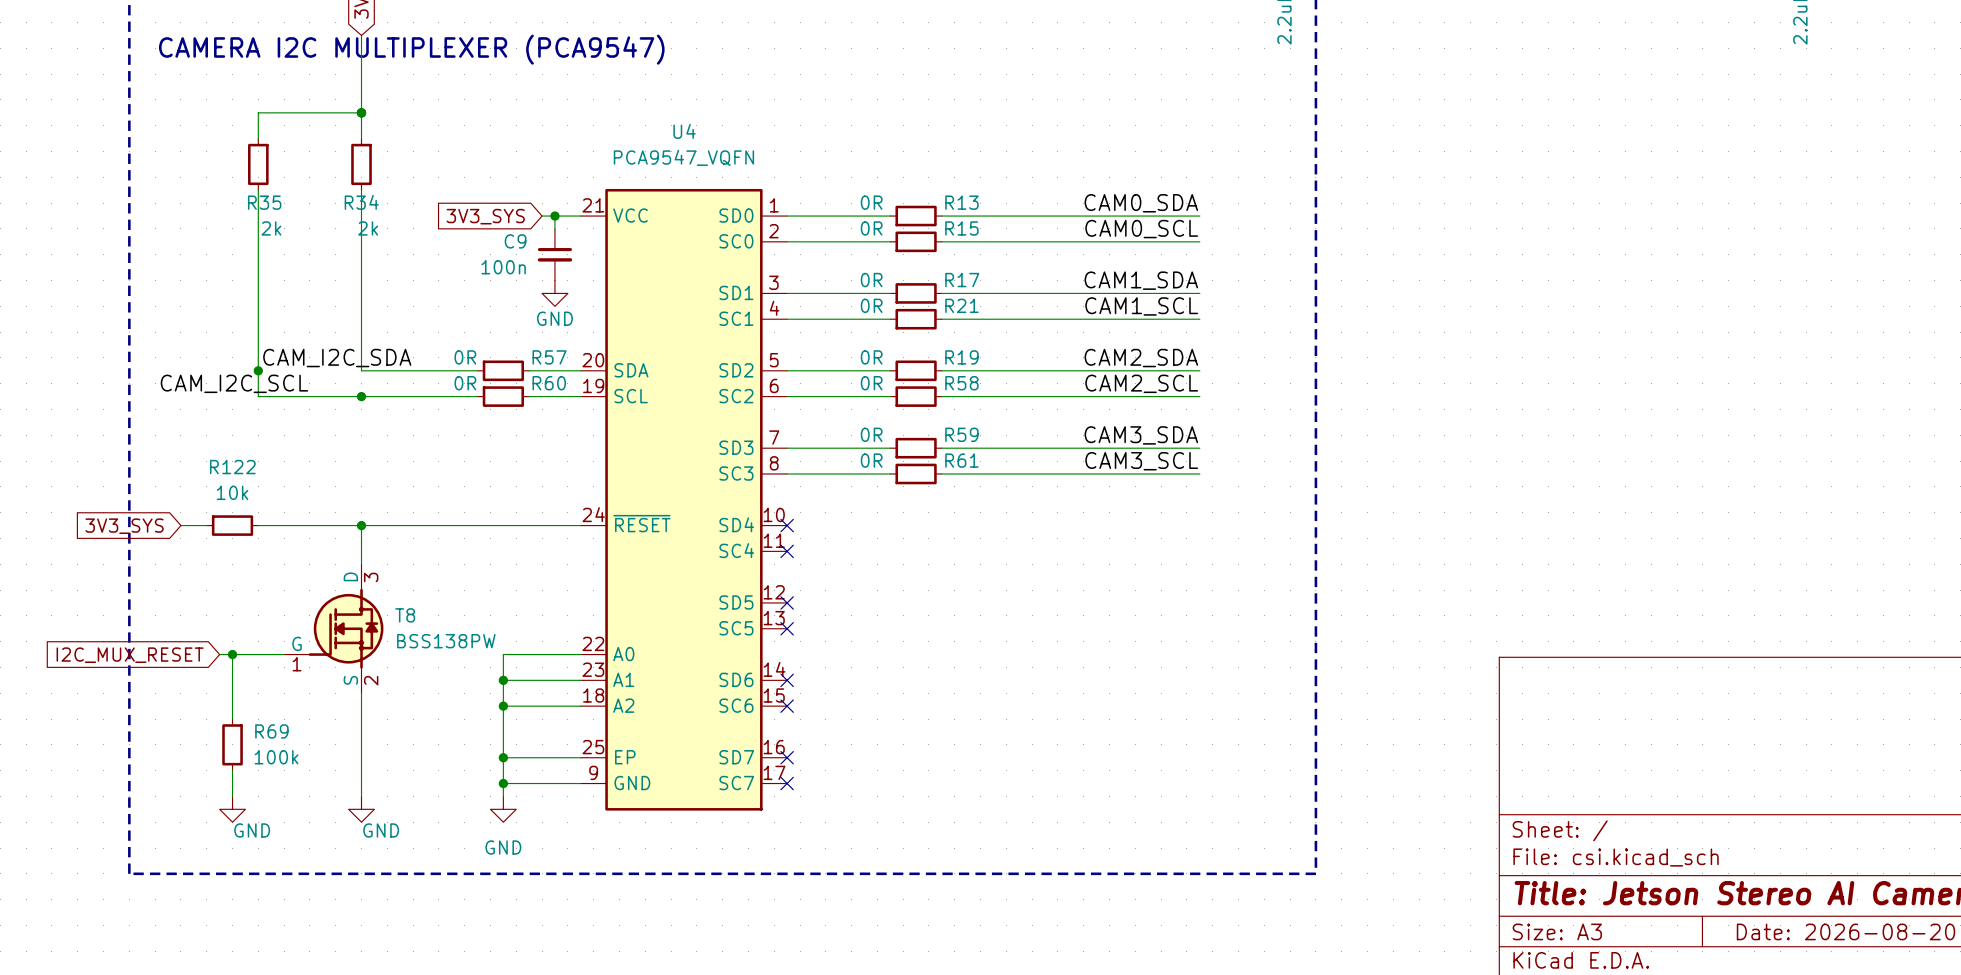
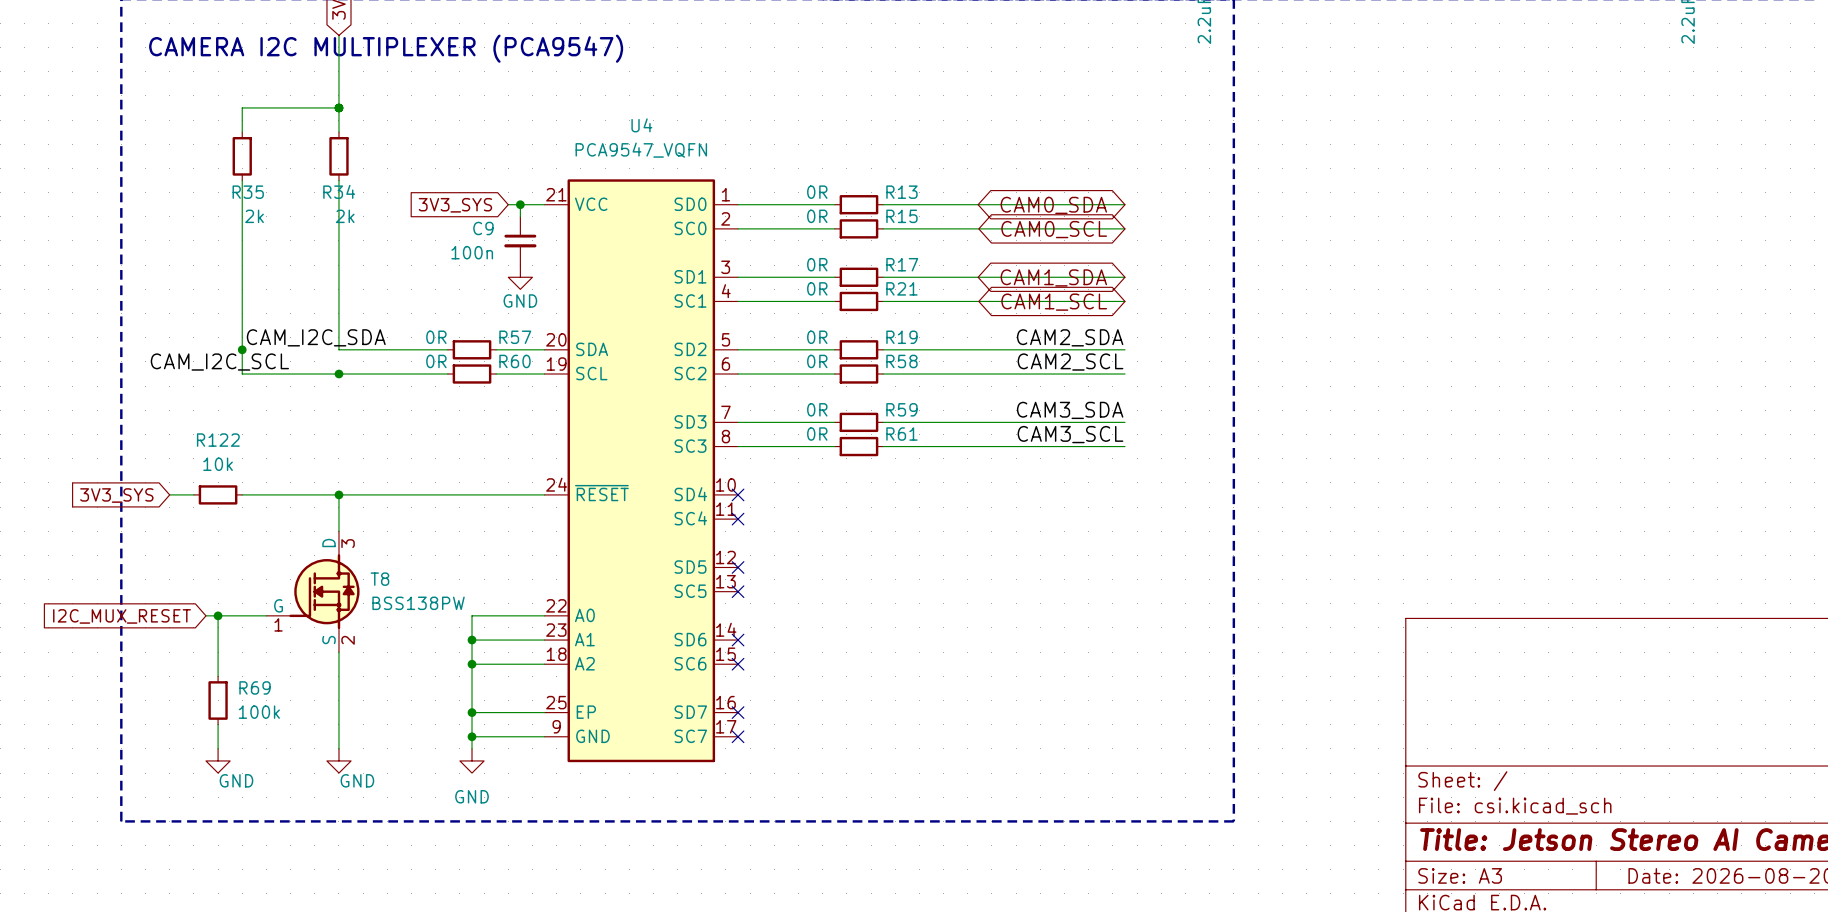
label: CAM0_SDA (1141, 203) -> none
global label: none -> CAM0_SDA (1053, 205)
label: CAM0_SCL (1141, 229) -> none
global label: none -> CAM0_SCL (1054, 229)
label: CAM1_SDA (1141, 280) -> none
global label: none -> CAM1_SDA (1053, 277)
label: CAM1_SCL (1141, 306) -> none
global label: none -> CAM1_SCL (1054, 302)

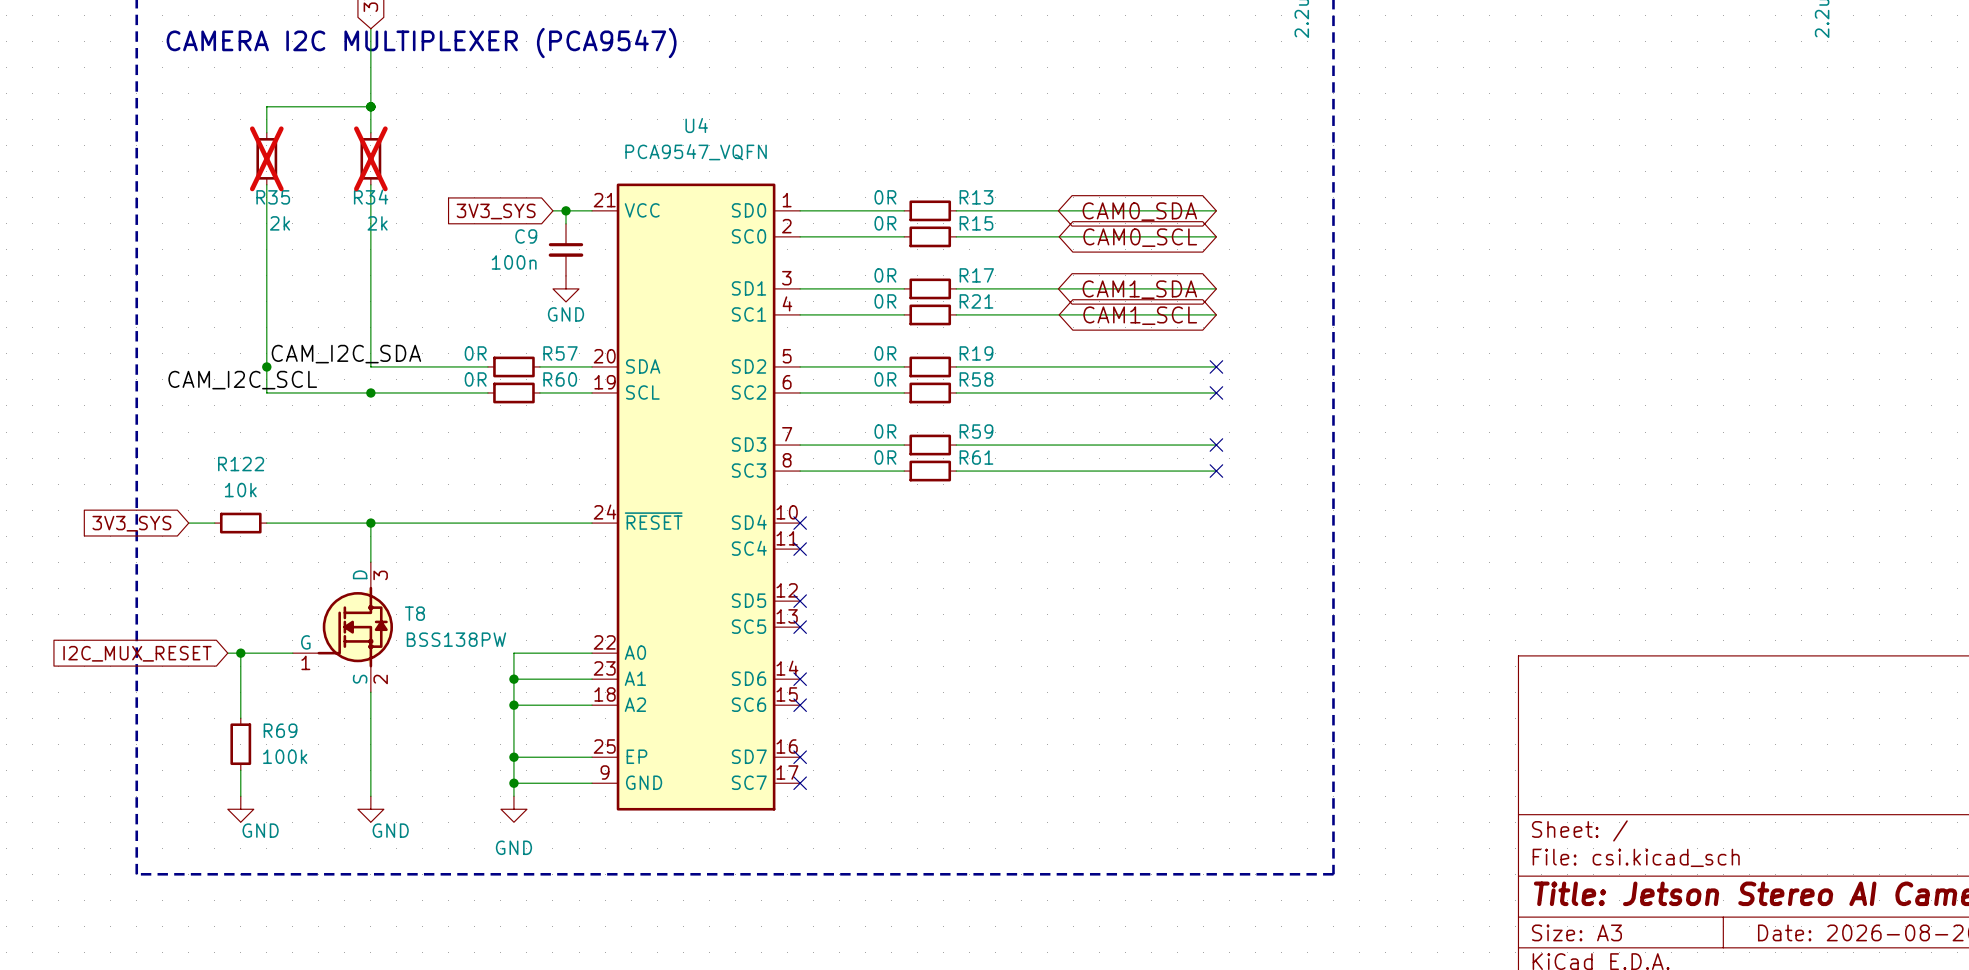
R35 do-not-place cross: none -> (266, 158)
R34 do-not-place cross: none -> (370, 158)
label: CAM2_SDA (1070, 337) -> none
no-connect mark: none -> (1216, 366)
label: CAM2_SCL (1070, 362) -> none
no-connect mark: none -> (1216, 392)
label: CAM3_SDA (1070, 410) -> none
no-connect mark: none -> (1216, 445)
label: CAM3_SCL (1070, 434) -> none
no-connect mark: none -> (1216, 471)

